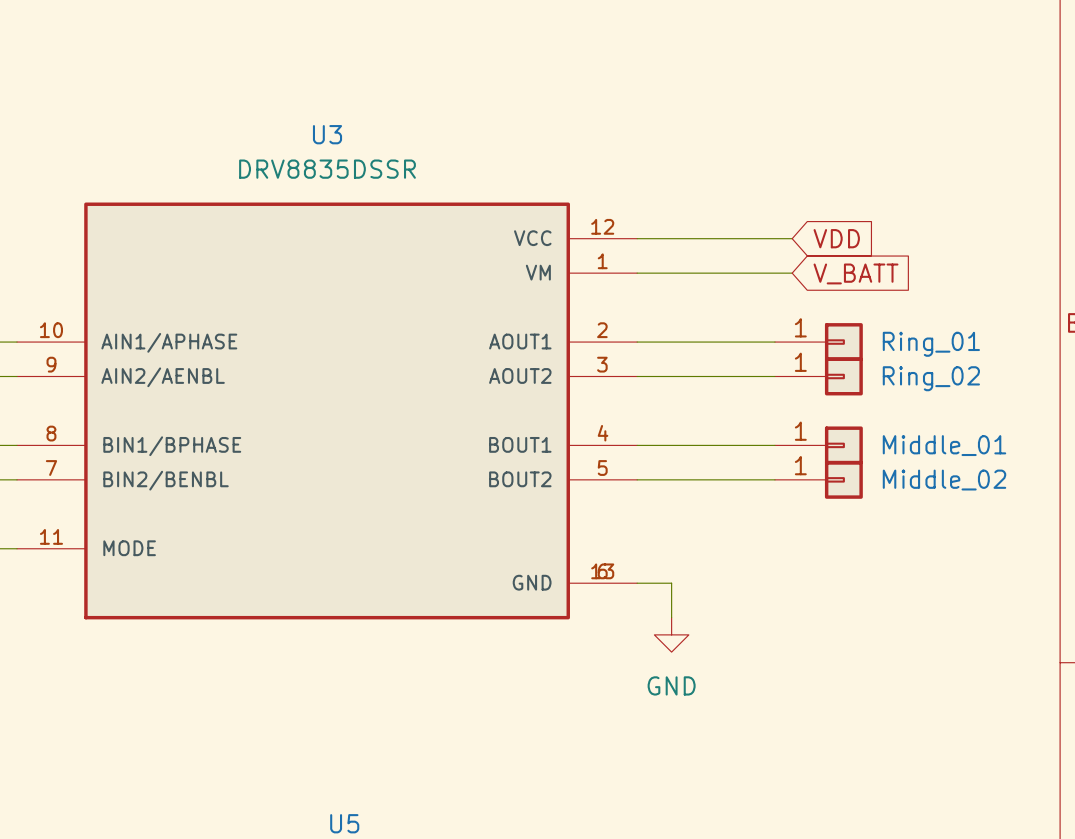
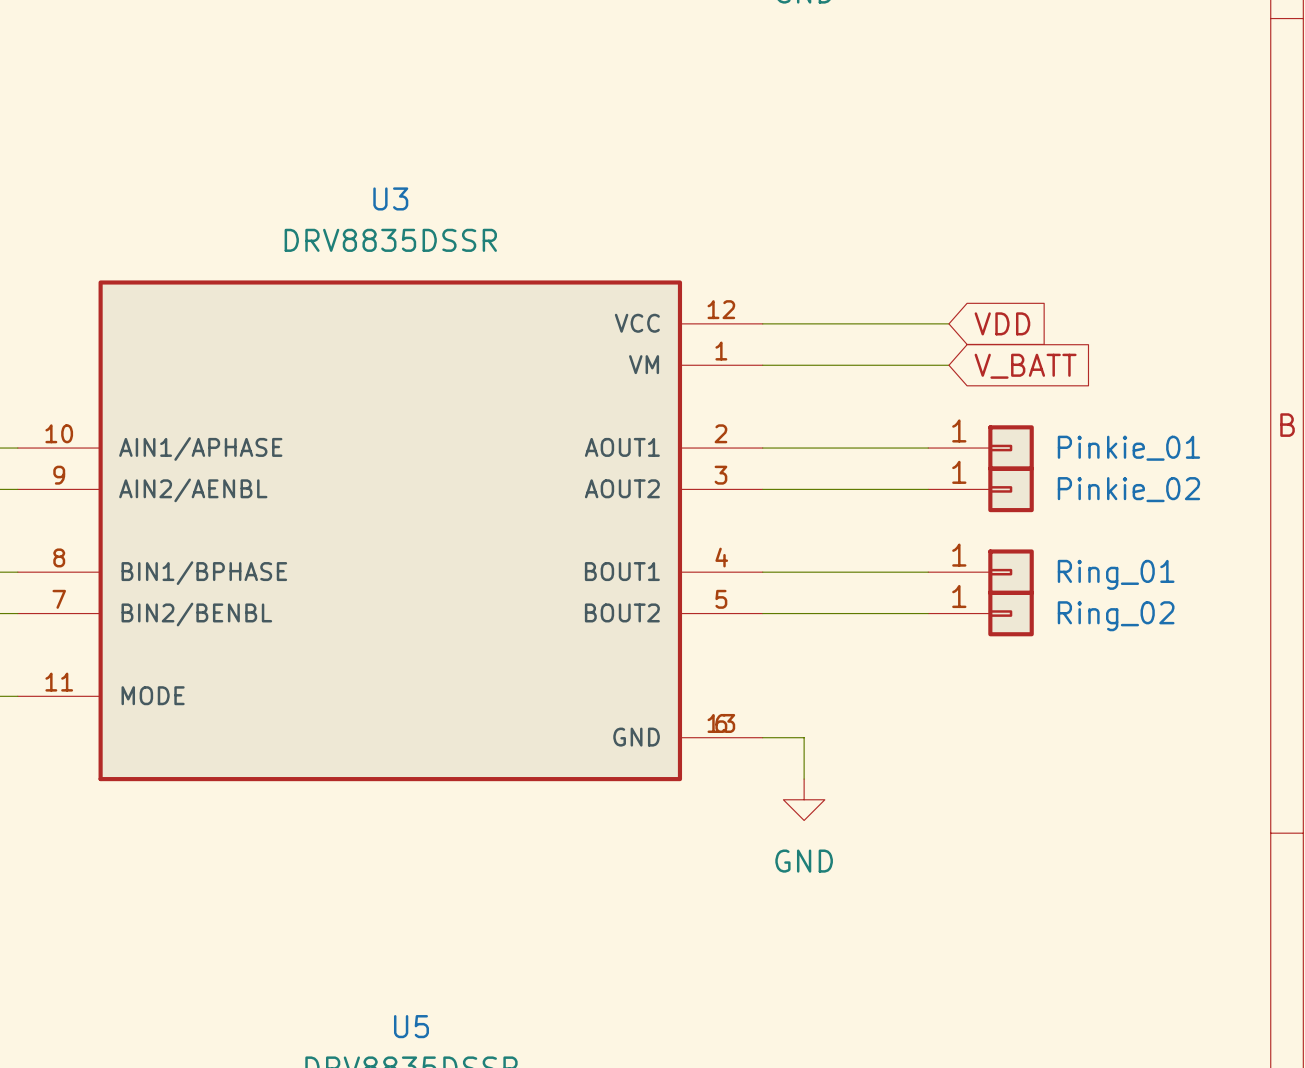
Ring_01 name: Ring_01 (931, 344) -> Pinkie_01 (1128, 448)
Ring_02 name: Ring_02 (931, 378) -> Pinkie_02 (1128, 489)
Middle_01 name: Middle_01 (944, 445) -> Ring_01 (1116, 574)
Middle_02 name: Middle_02 (944, 480) -> Ring_02 (1116, 616)

